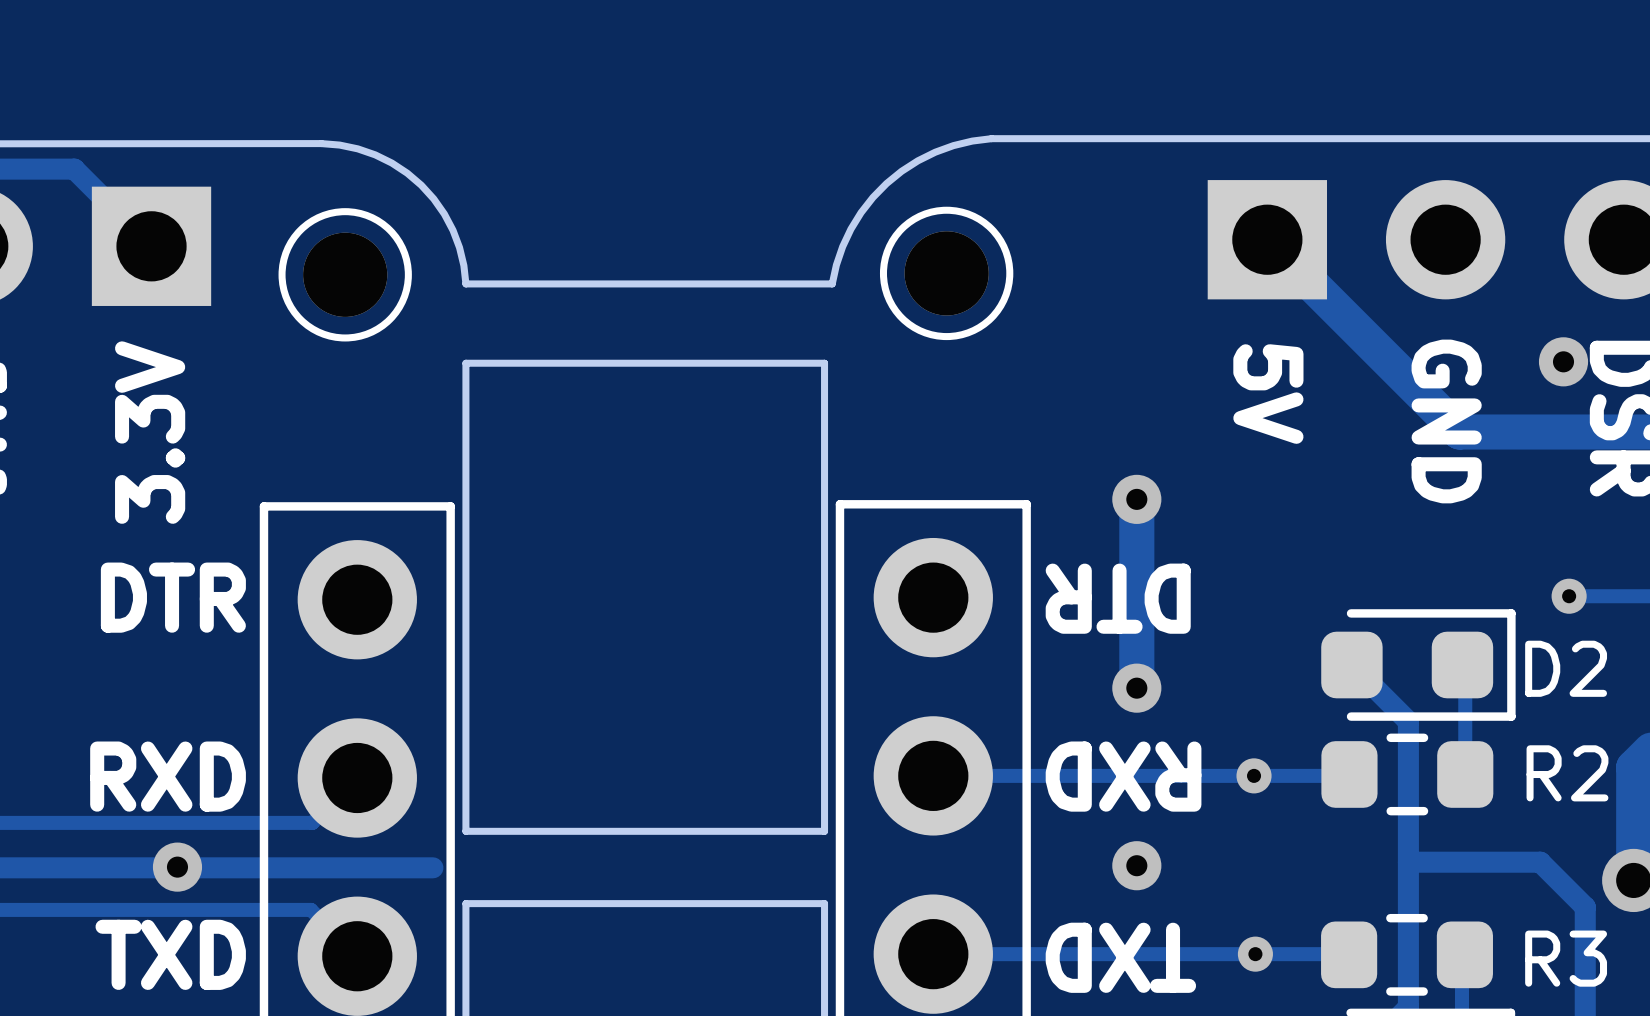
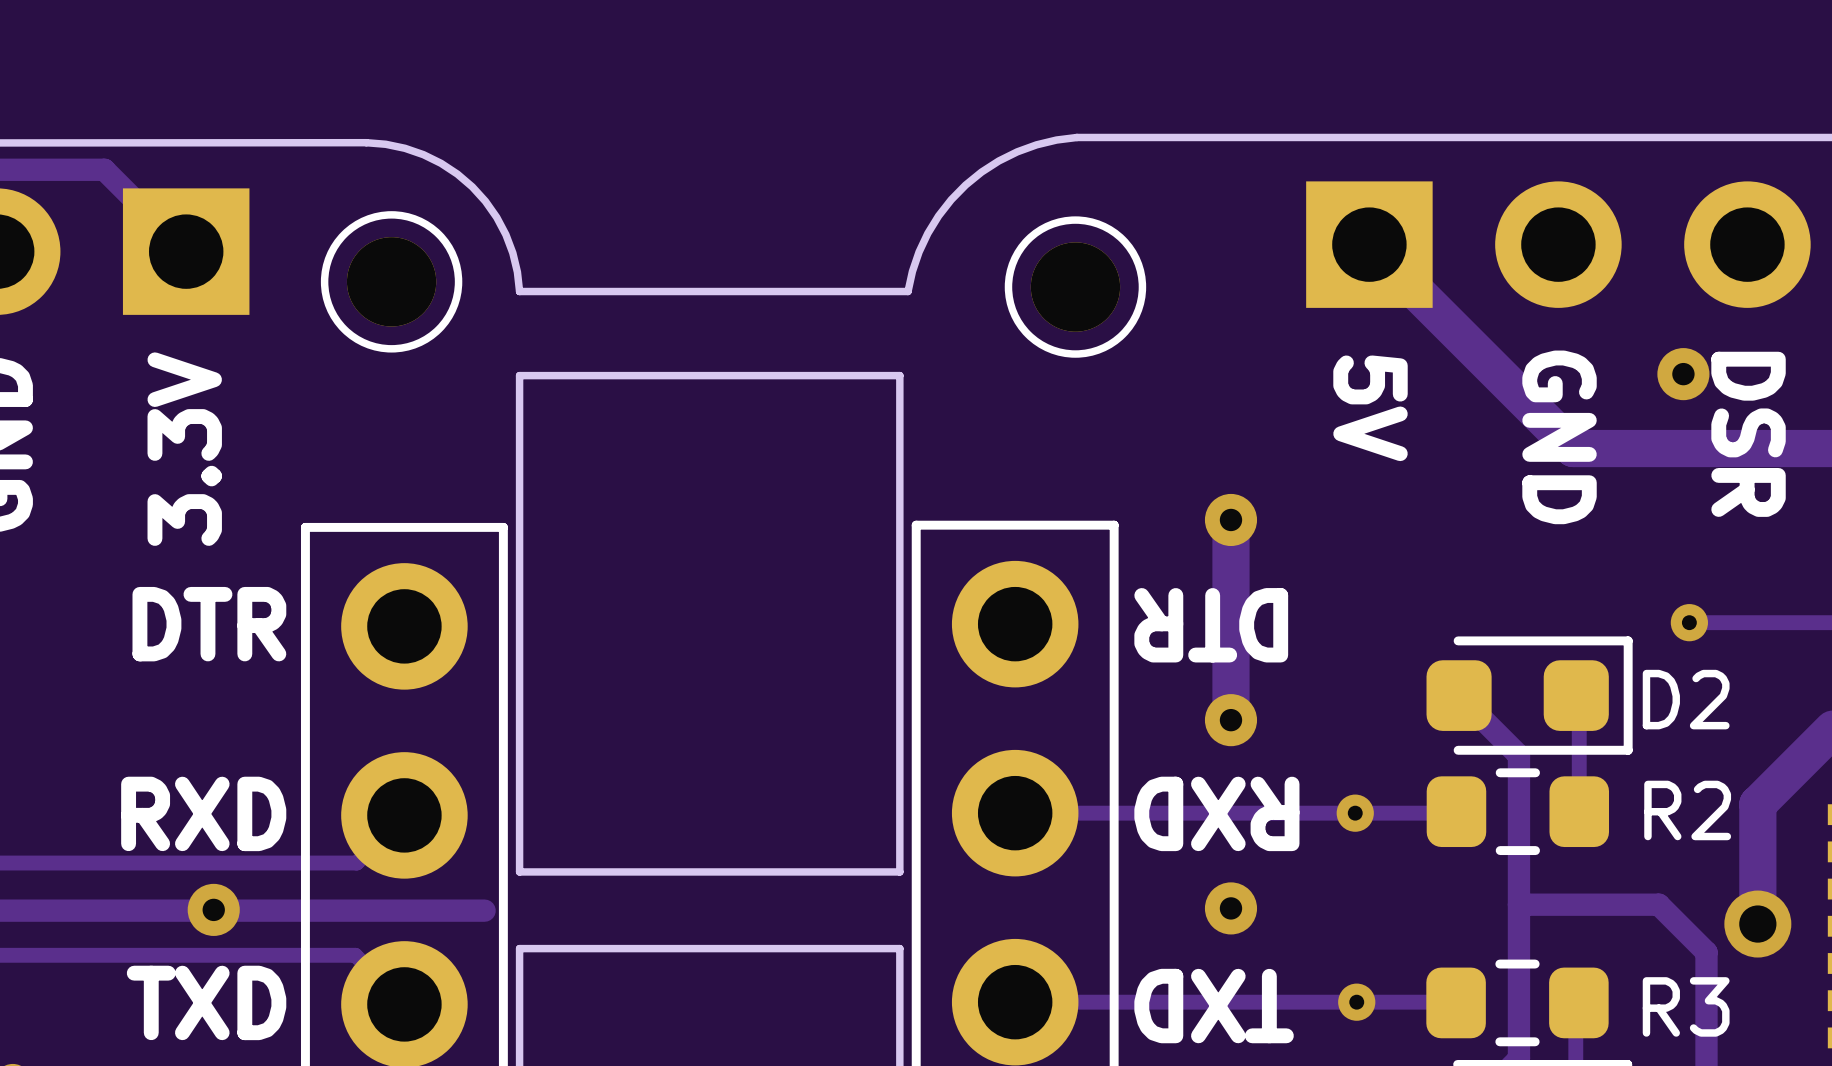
part position: (946, 273) -> (1075, 287)

